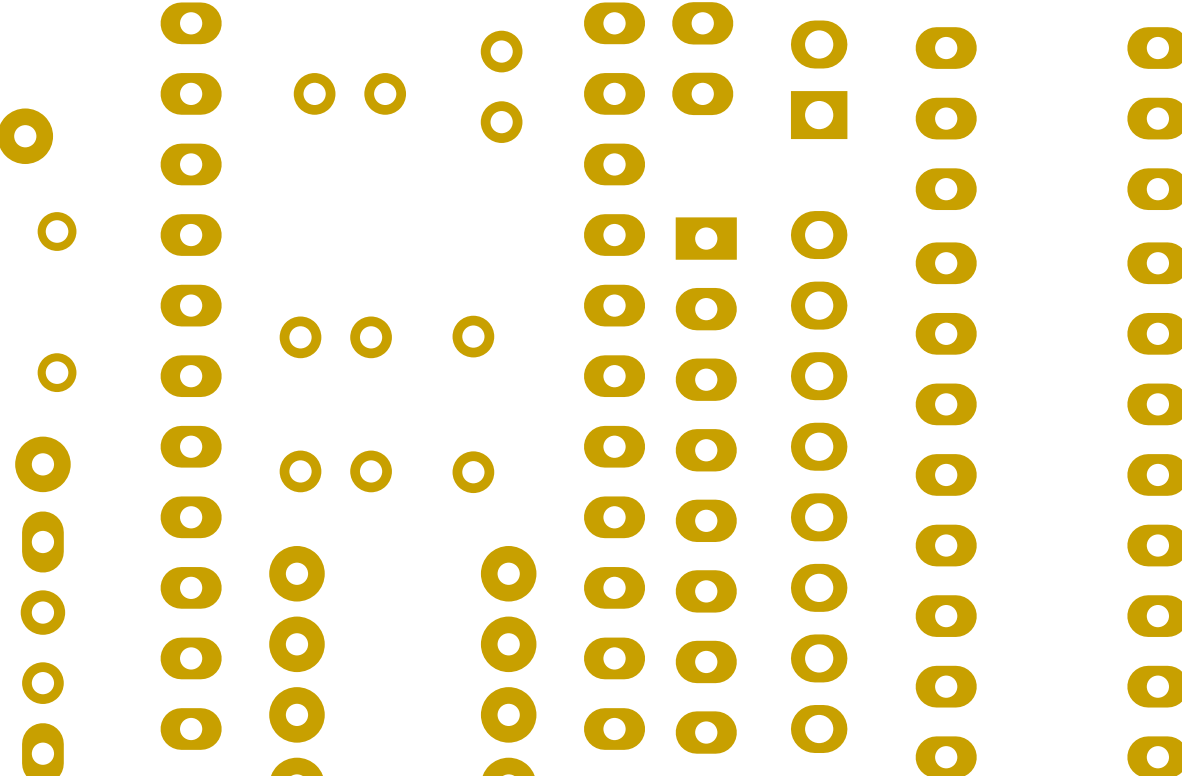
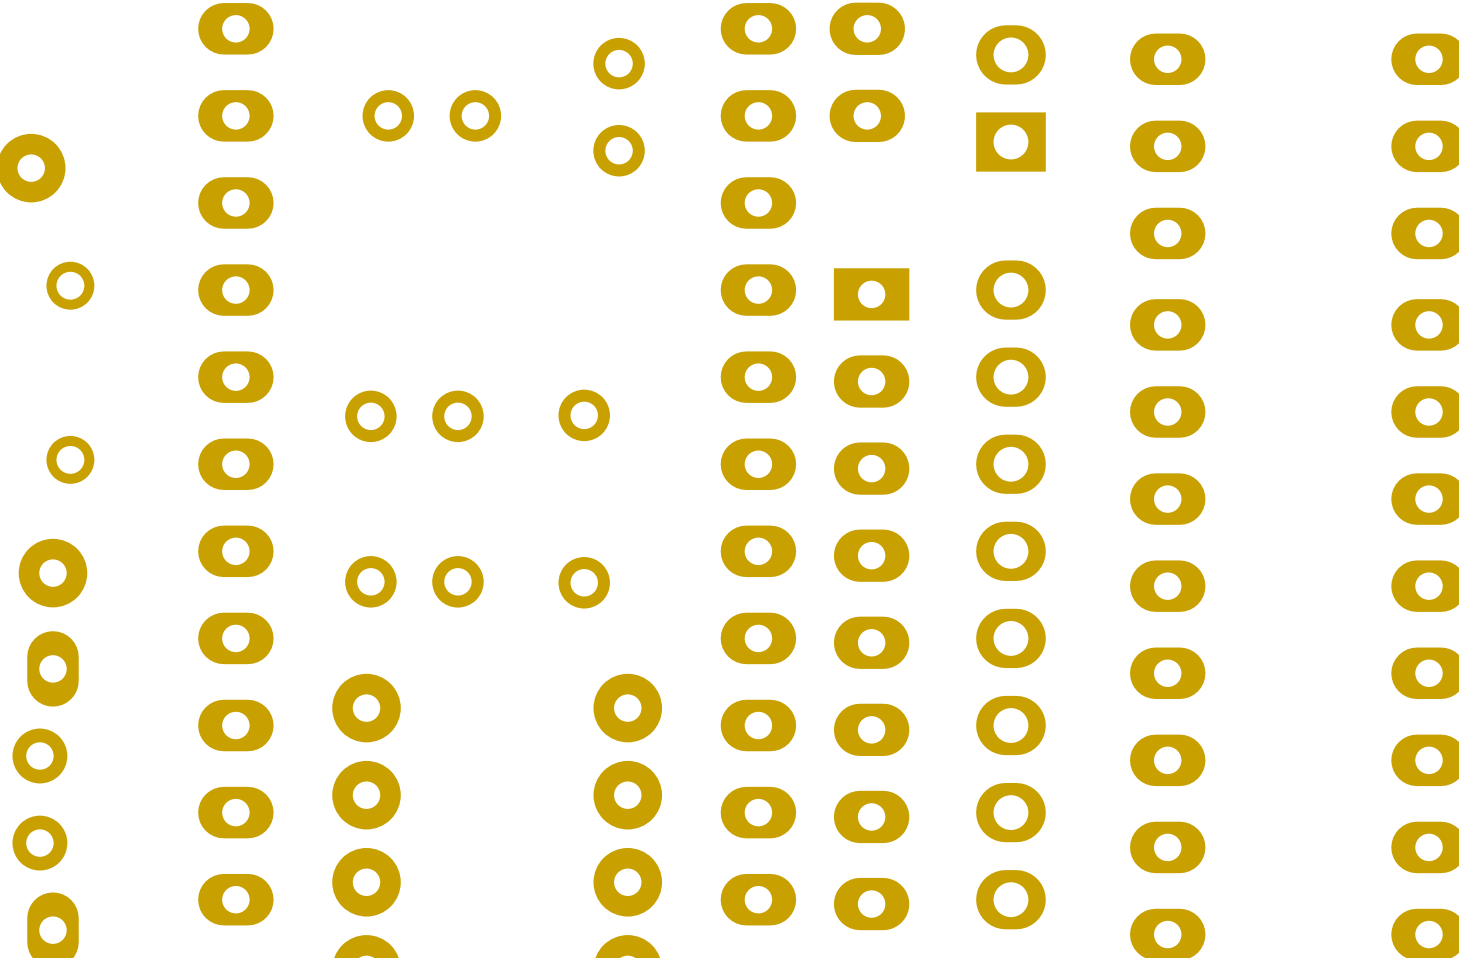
part footprint: [20, 590, 66, 704] -> [12, 728, 68, 871]

